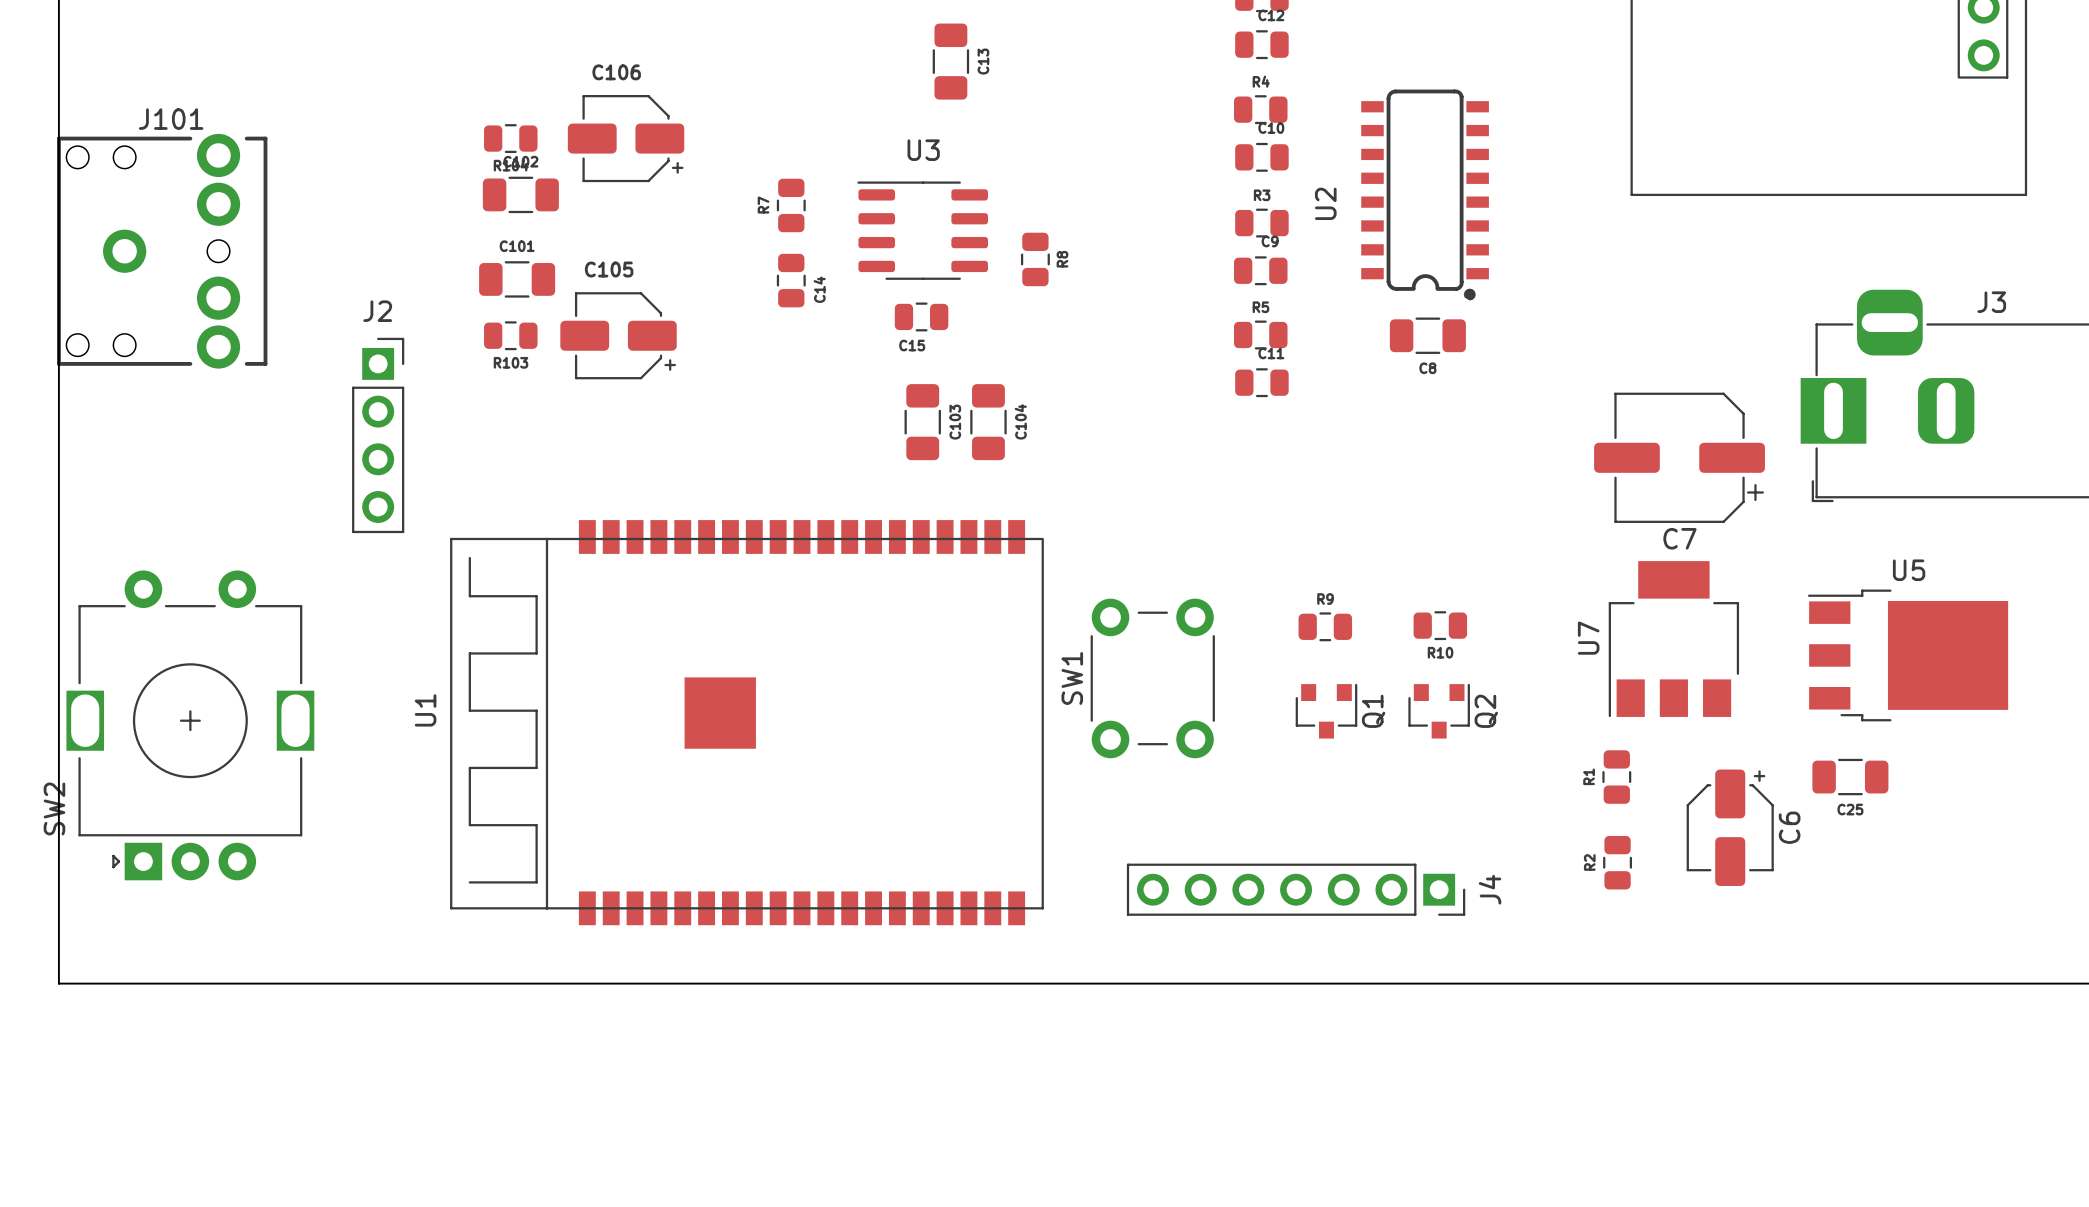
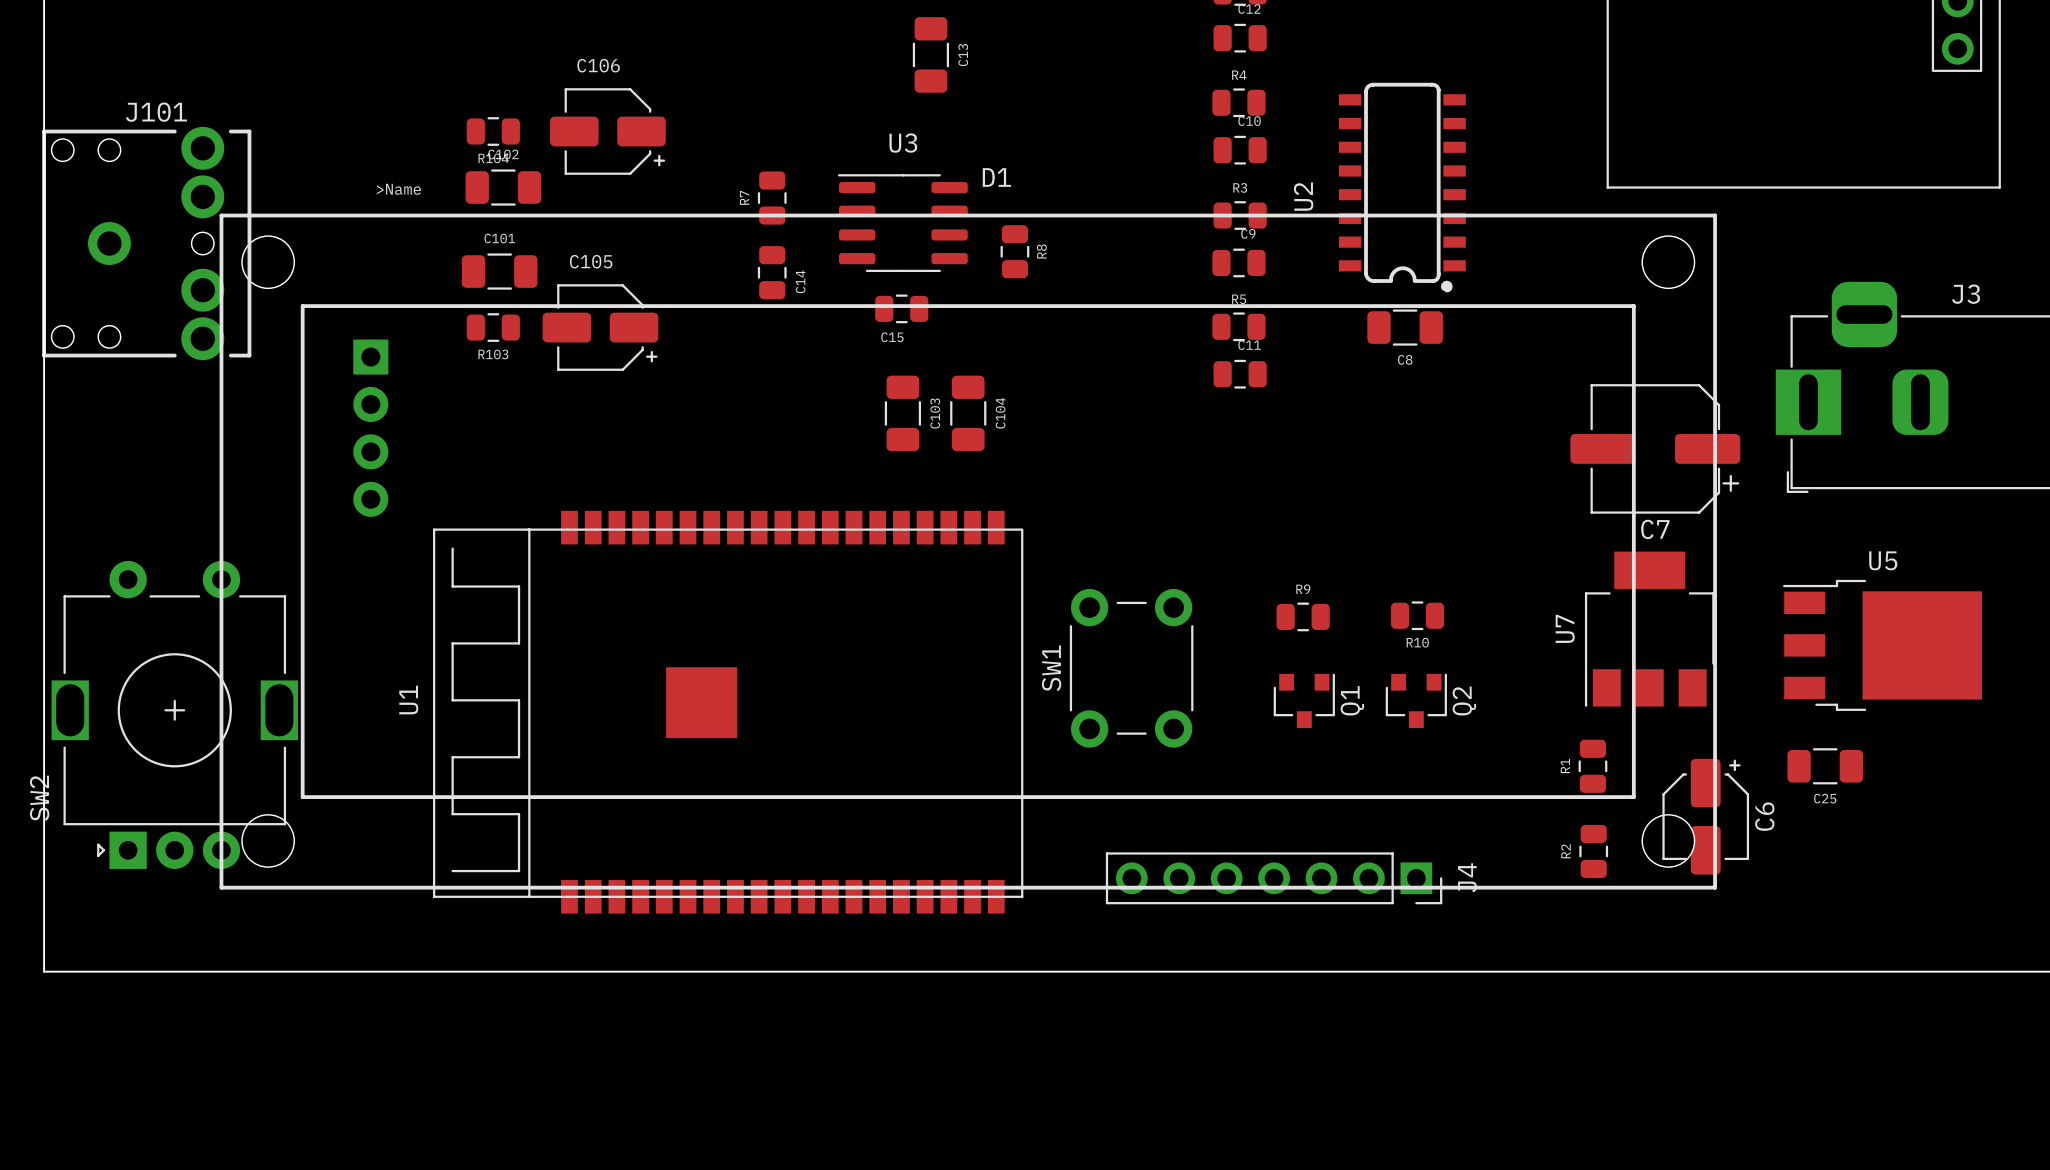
J2: (378, 435) -> none
D1: none -> (968, 551)

